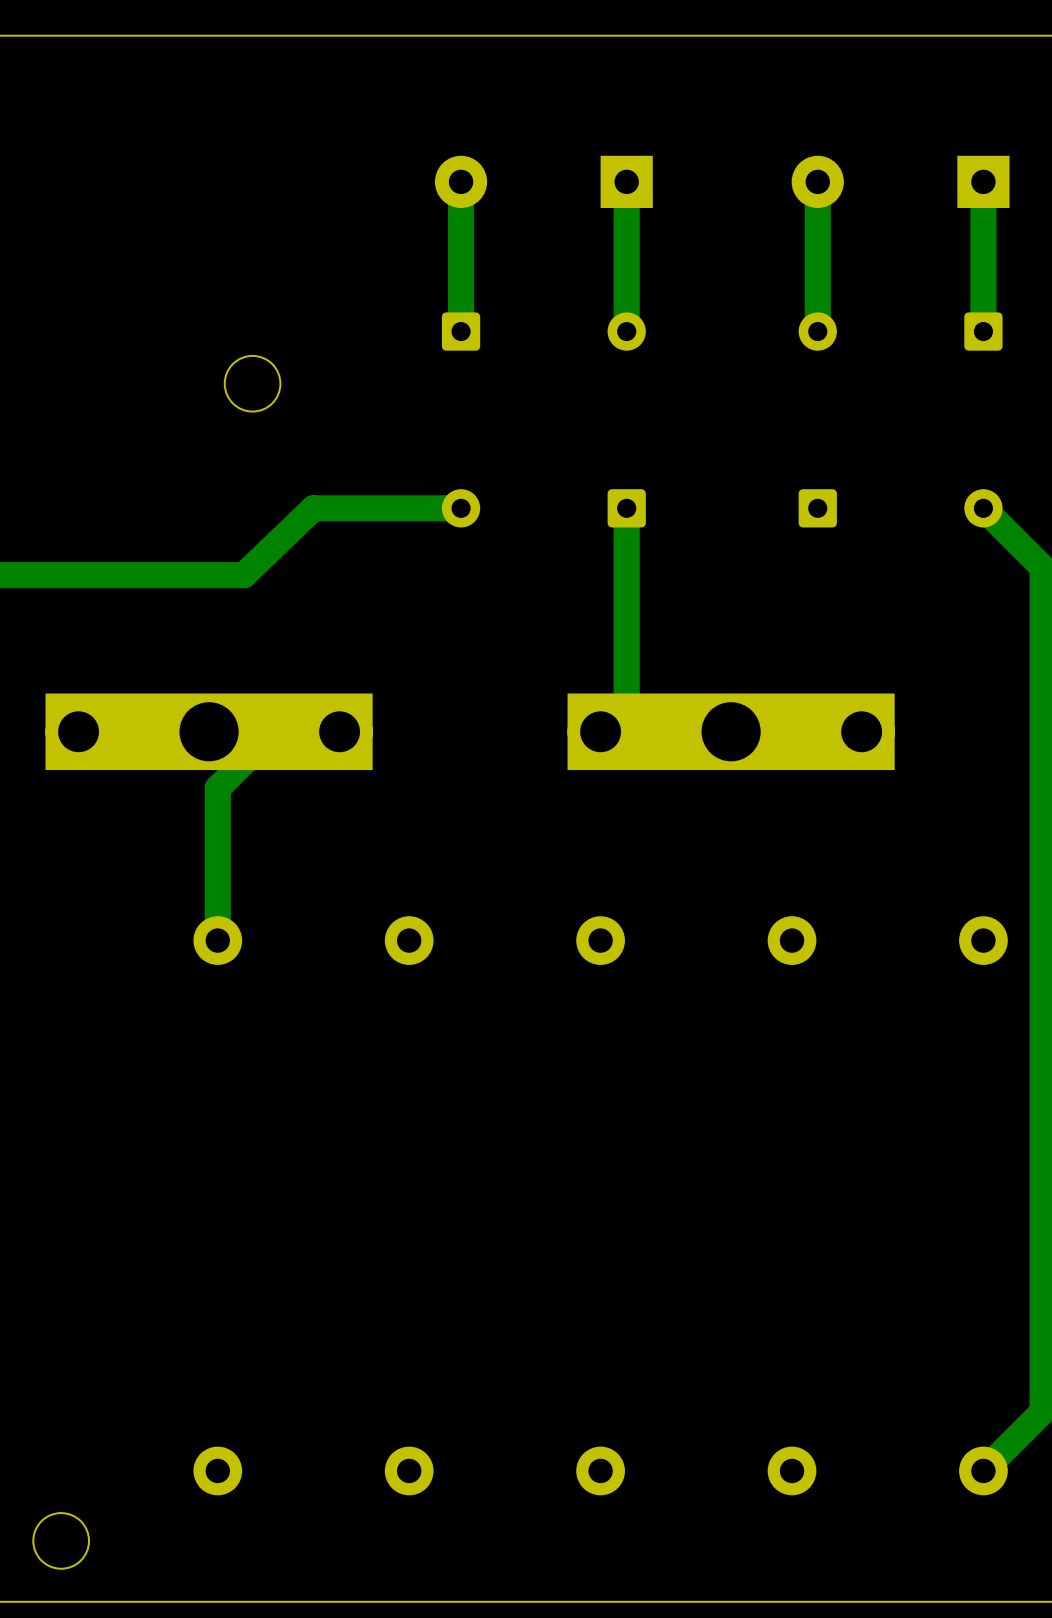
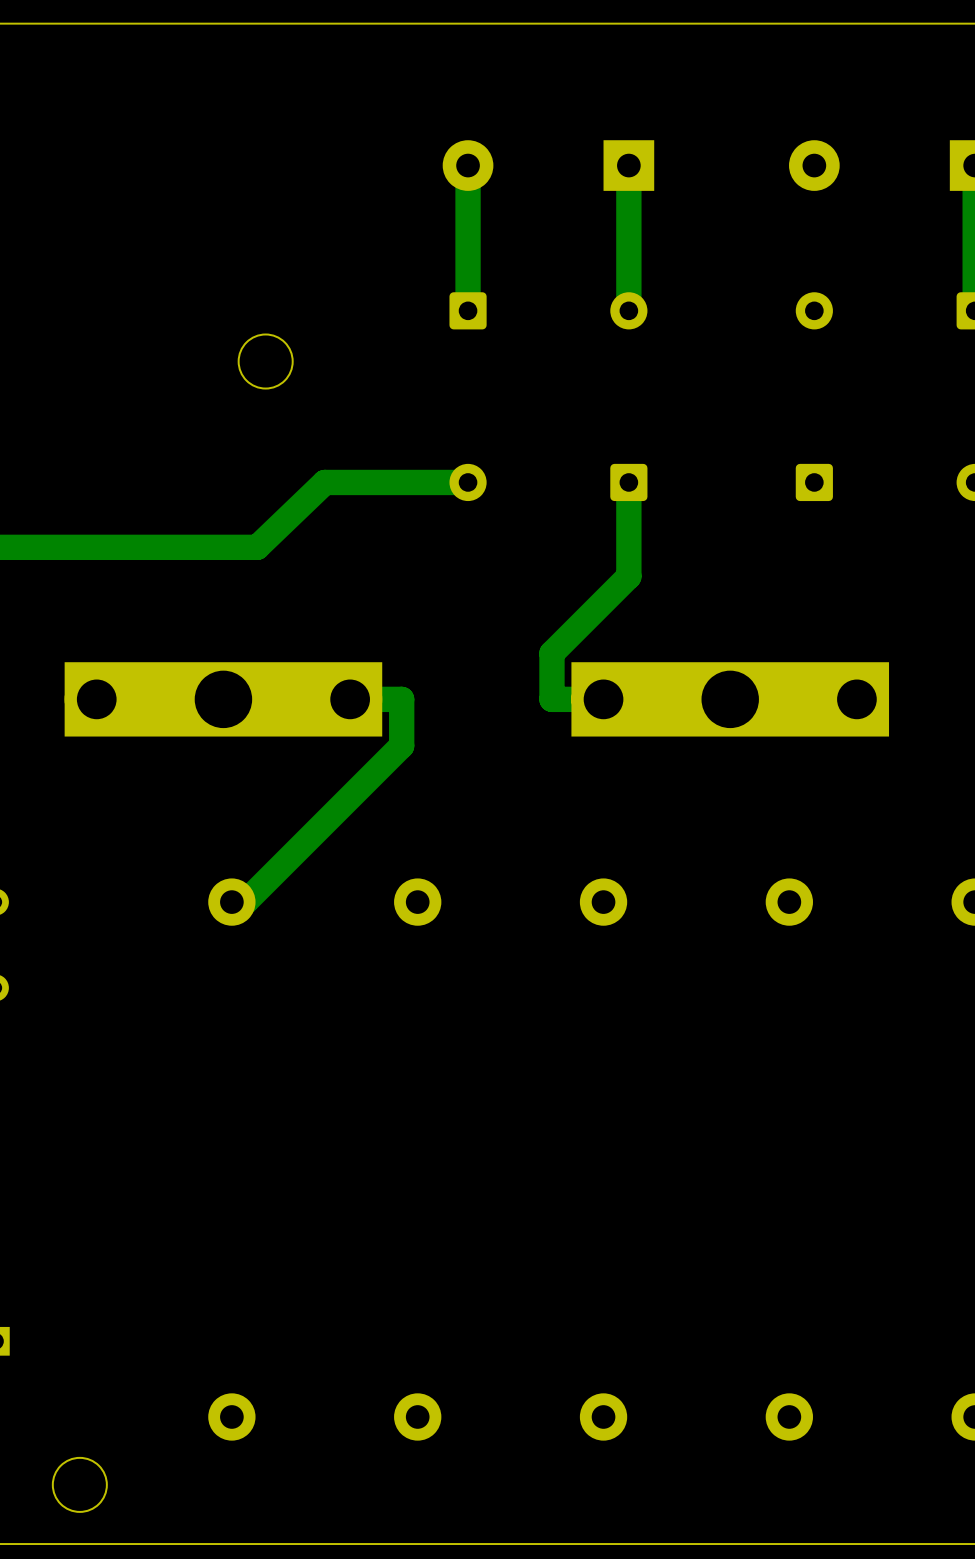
track: (817, 181) (817, 331) -> none
track: (626, 605) (626, 705) (600, 731) -> (628, 576) (551, 653) (551, 699) (730, 699)
track: (274, 731) (217, 788) (217, 940) -> (350, 699) (401, 699) (401, 745) (245, 902) (231, 902)

